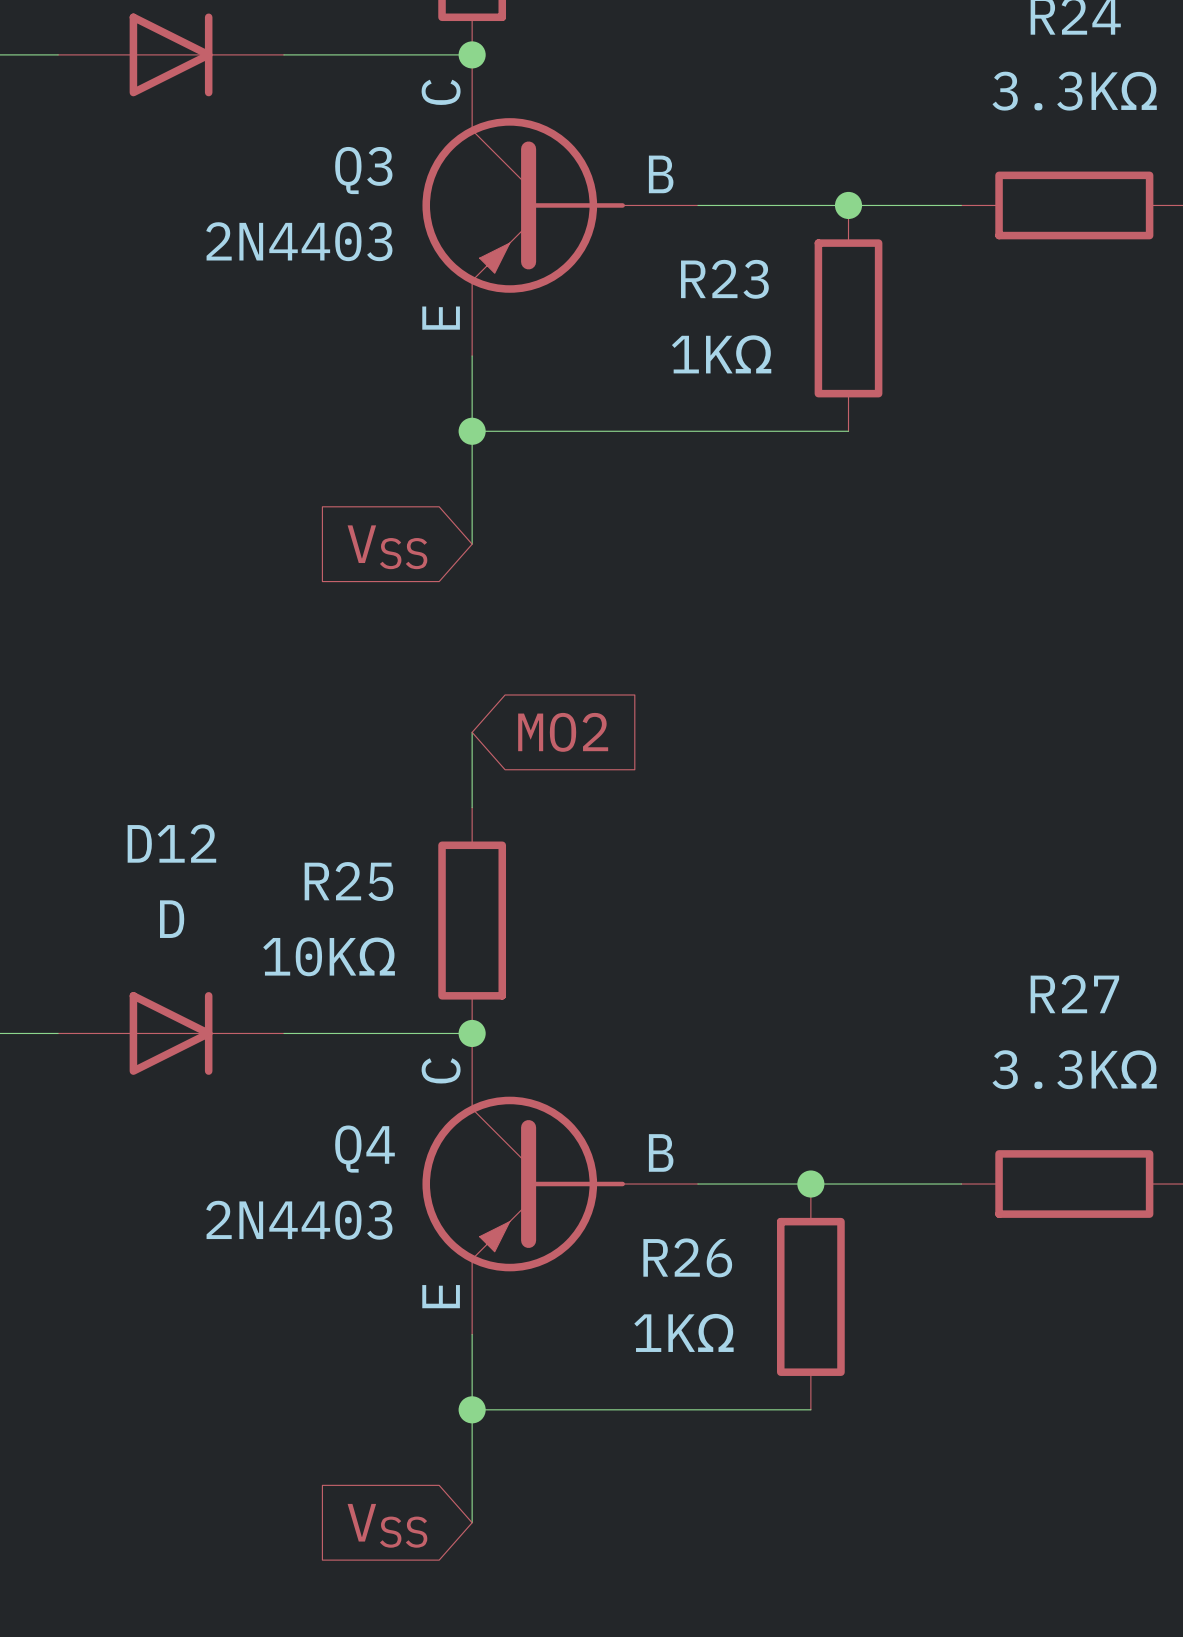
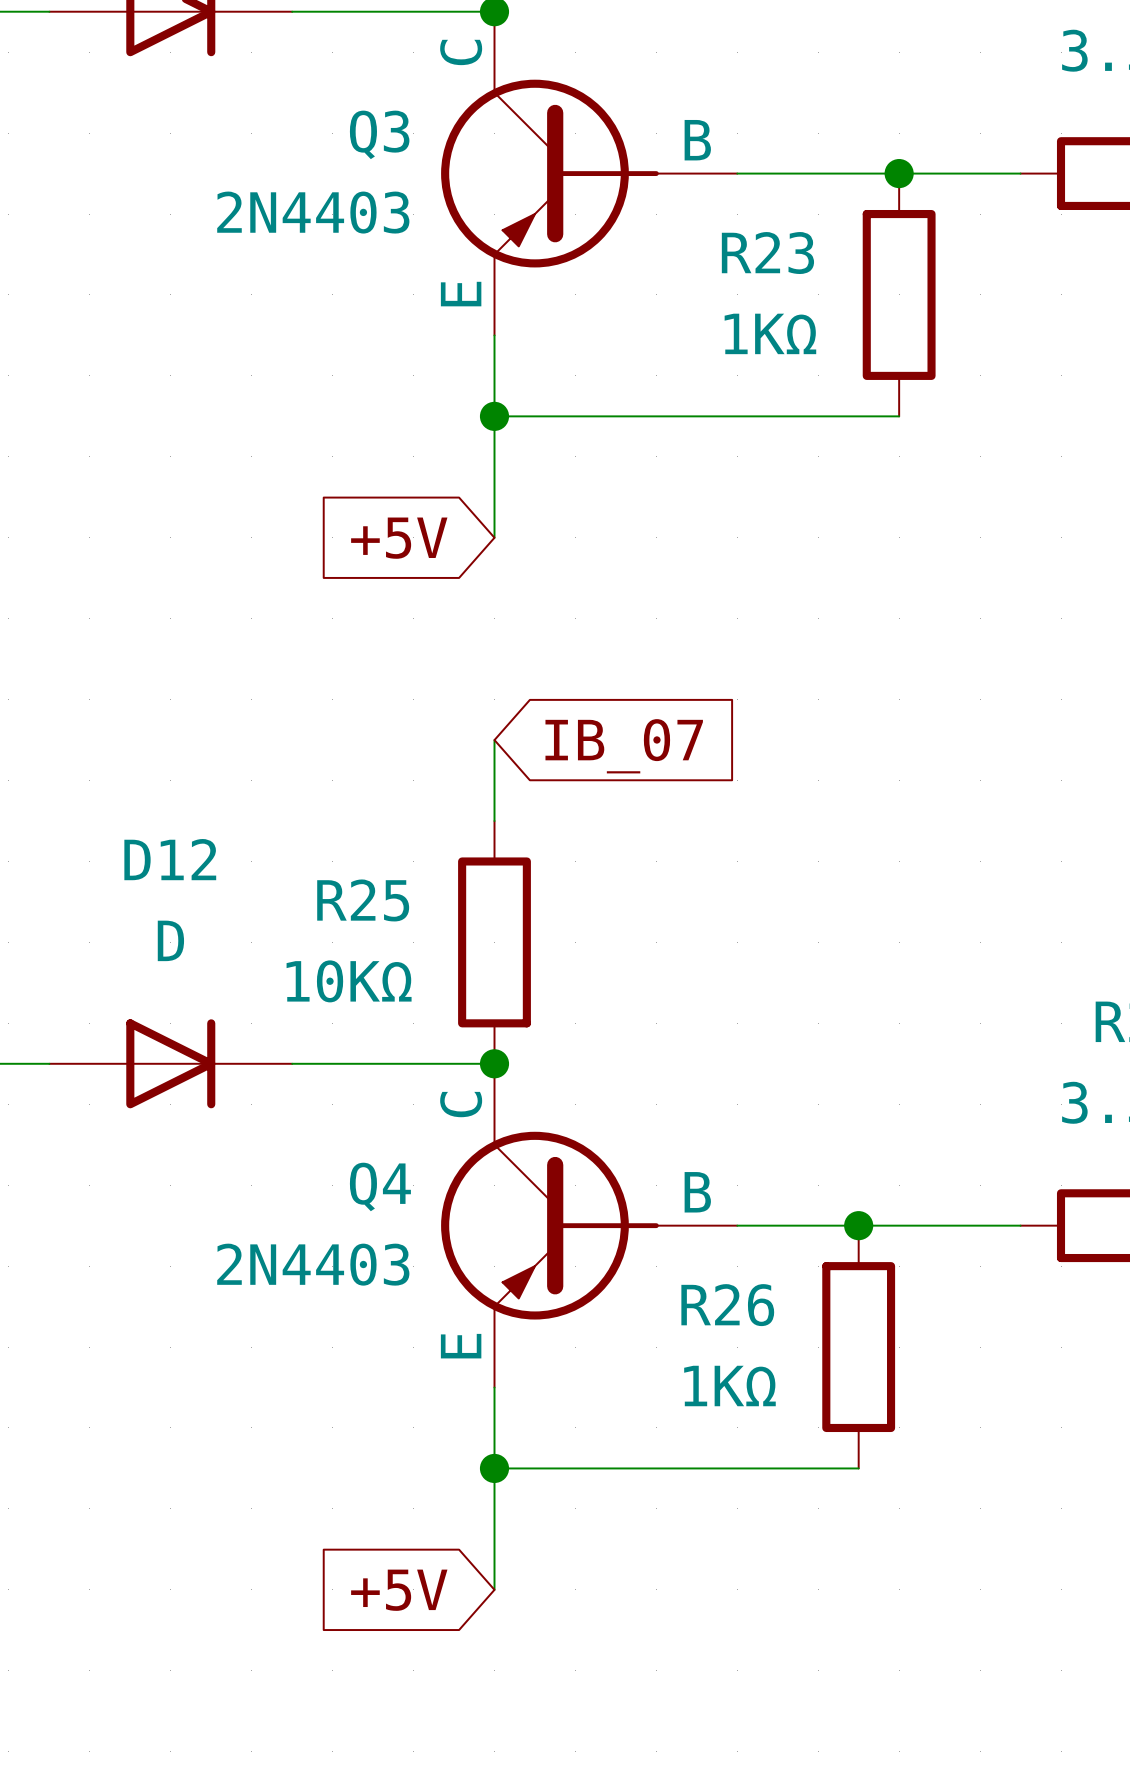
global label: VSS (387, 547) -> +5V (399, 538)
global label: MO2 (563, 732) -> IB_07 (624, 746)
global label: VSS (387, 1525) -> +5V (399, 1590)

